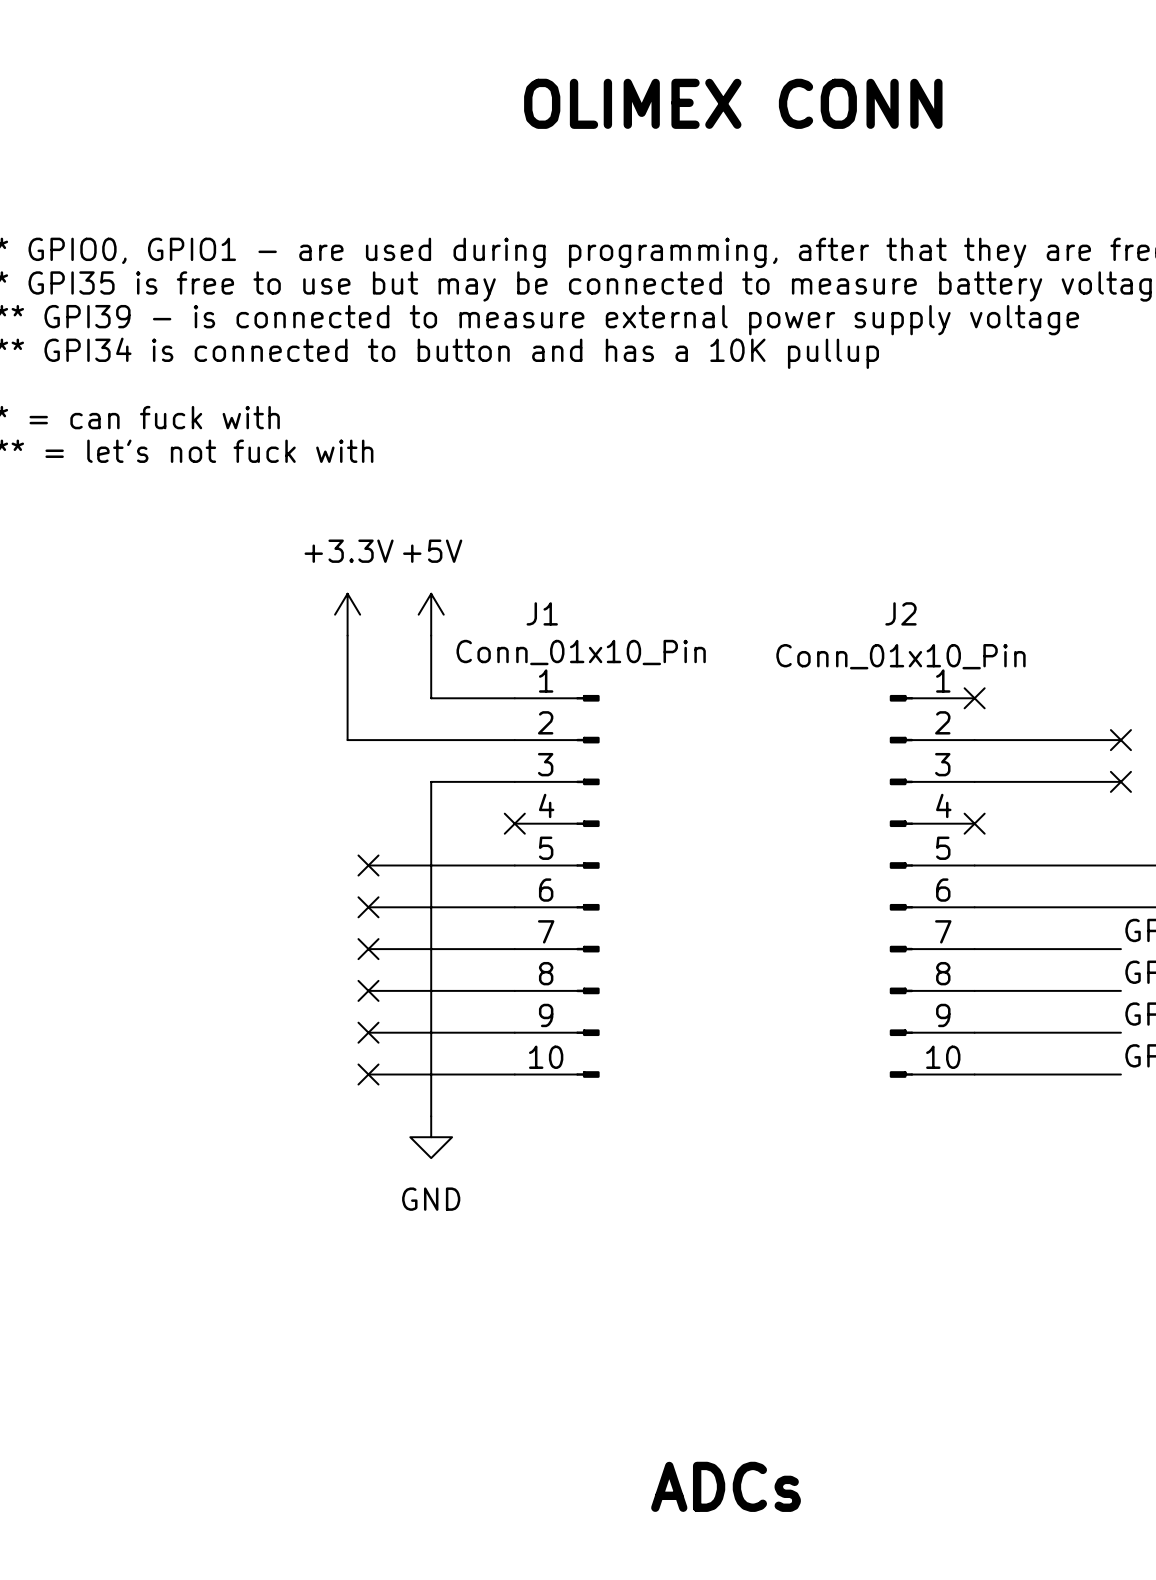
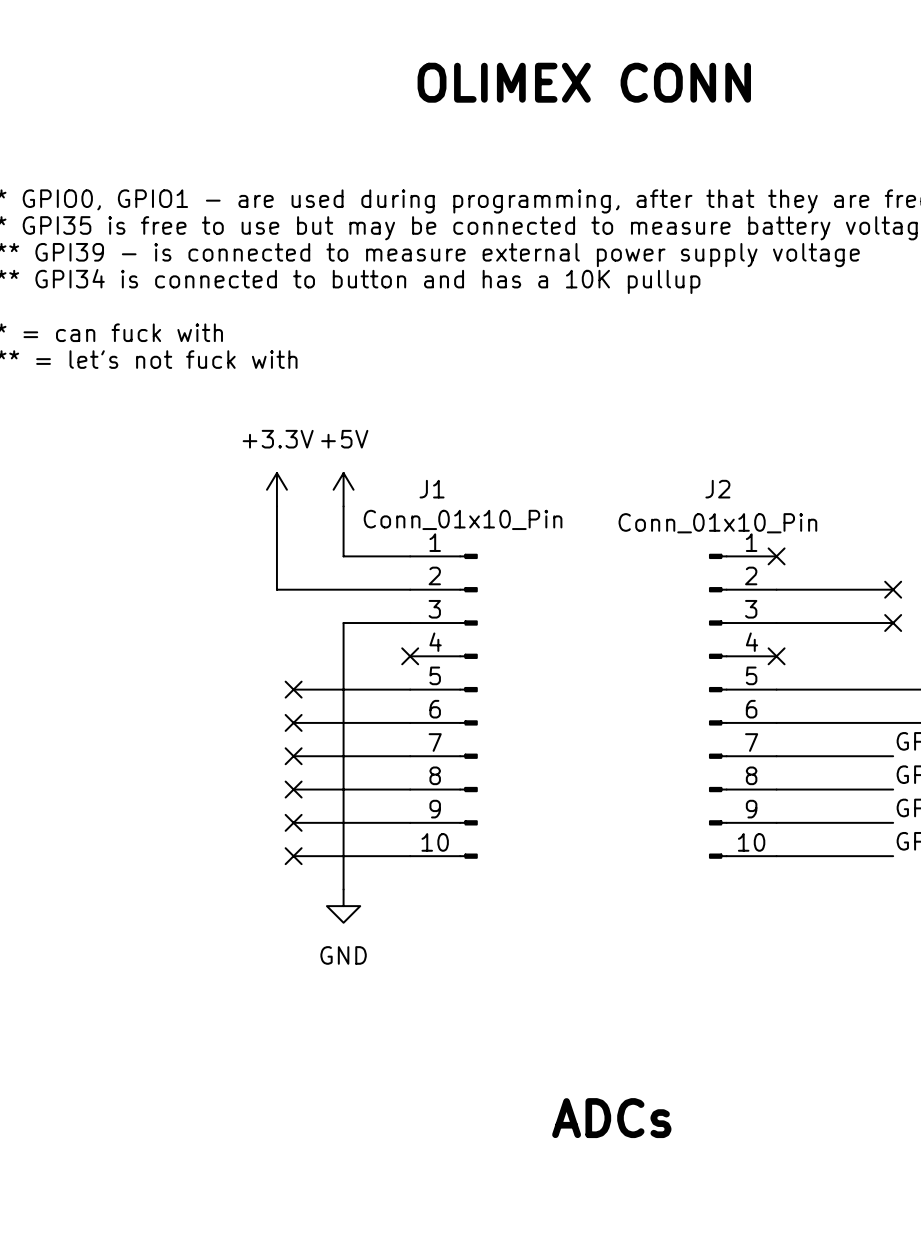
text position: ADCs (726, 1486) -> ADCs (611, 1118)

